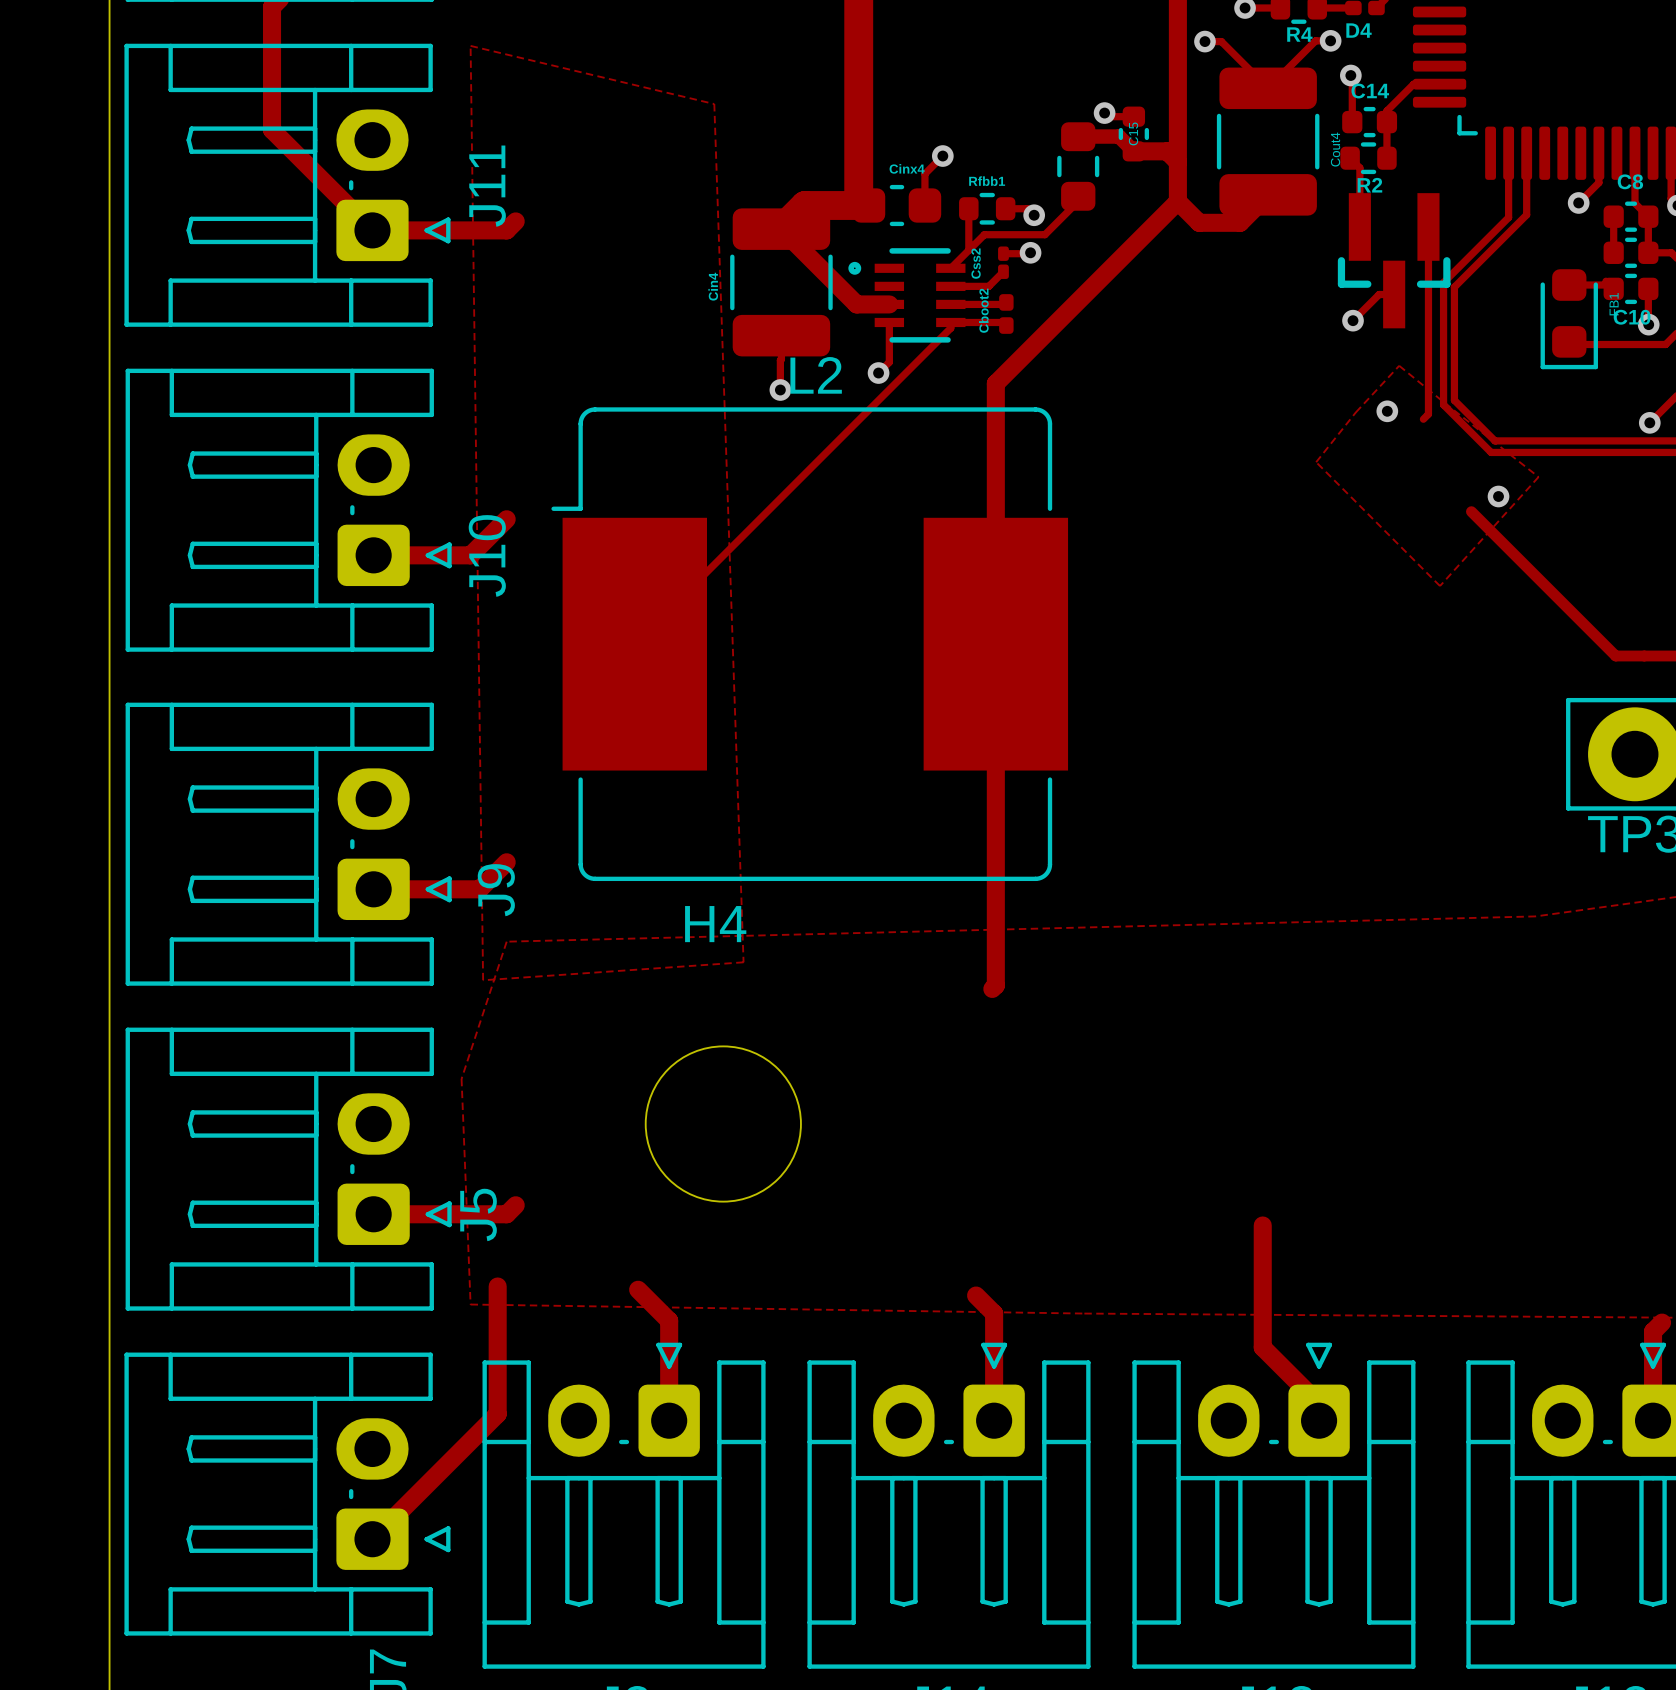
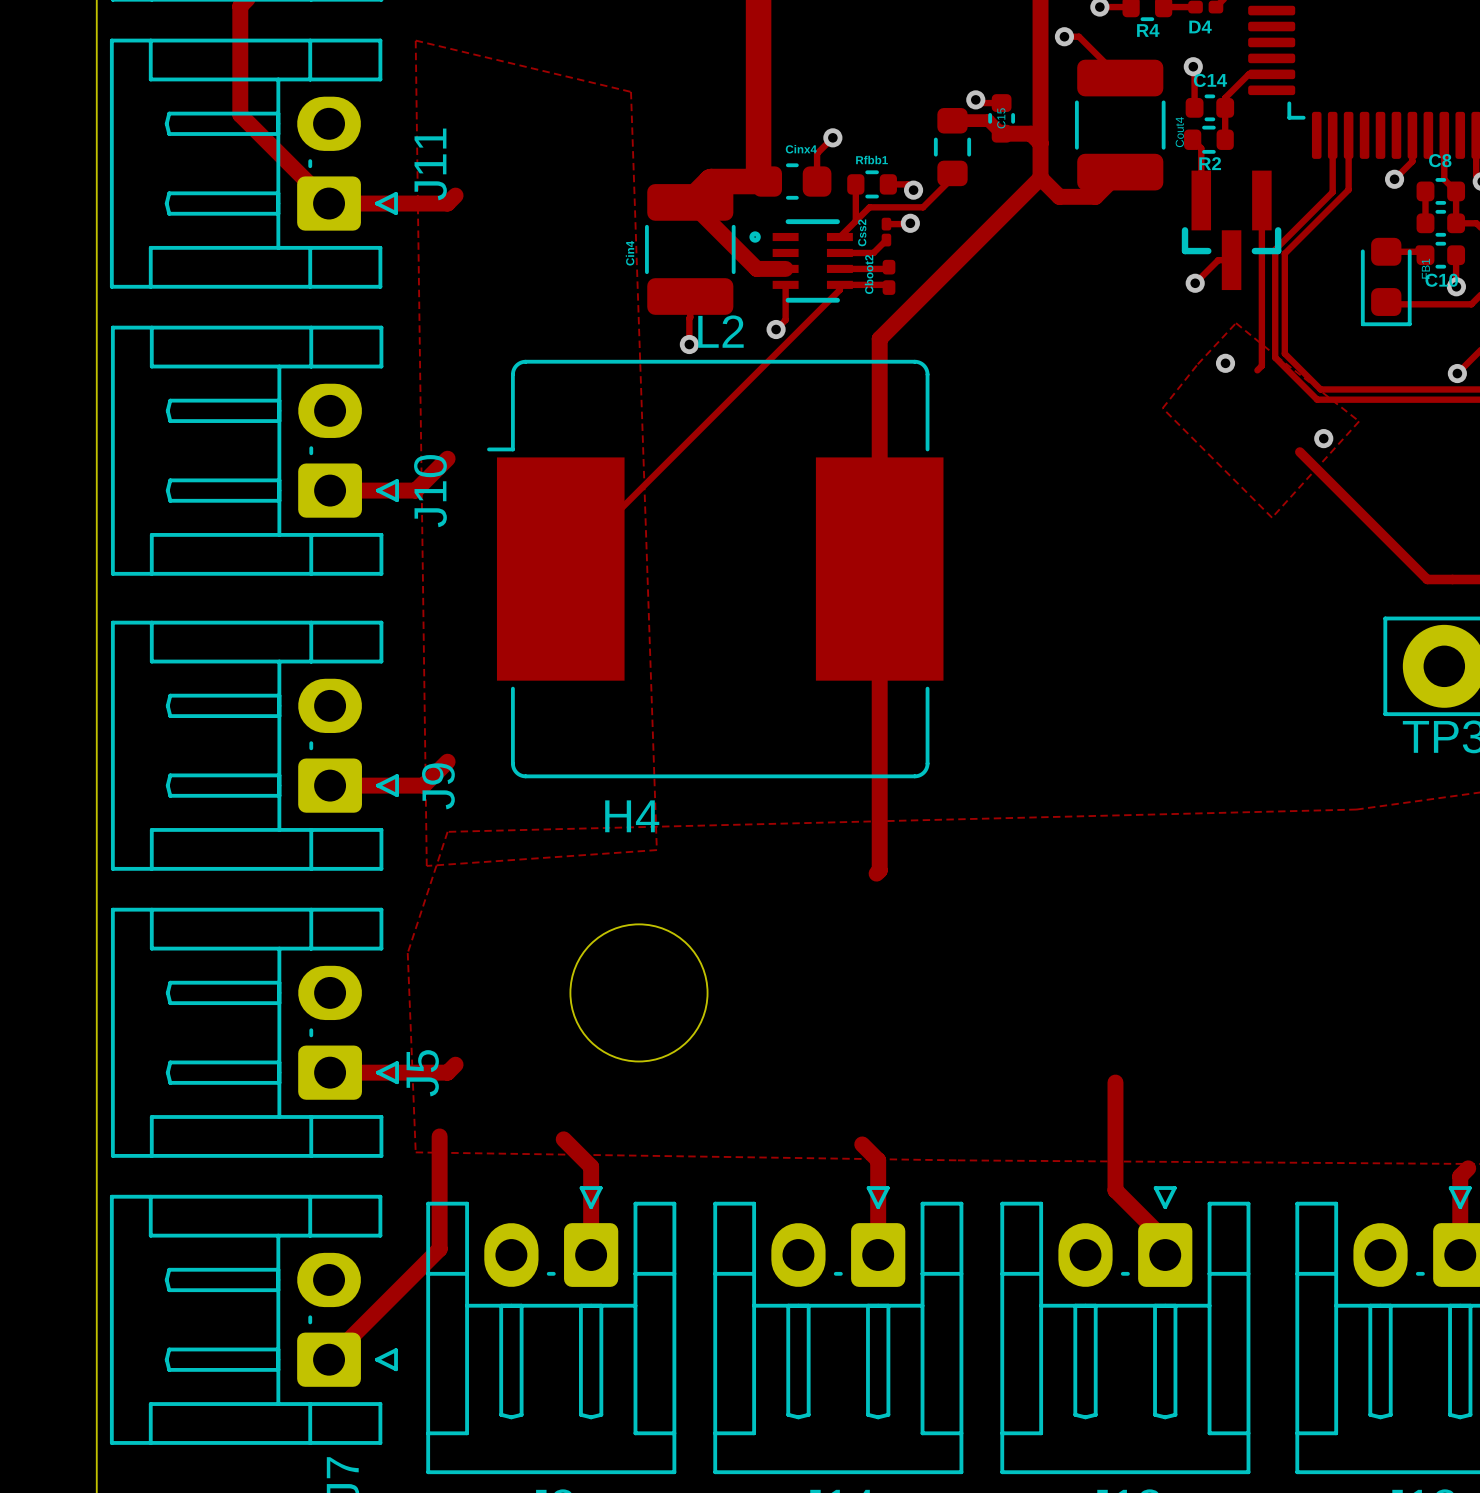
track: (1330, 40) (1315, 40) (1268, 88) -> none
via: (1330, 40) -> none

